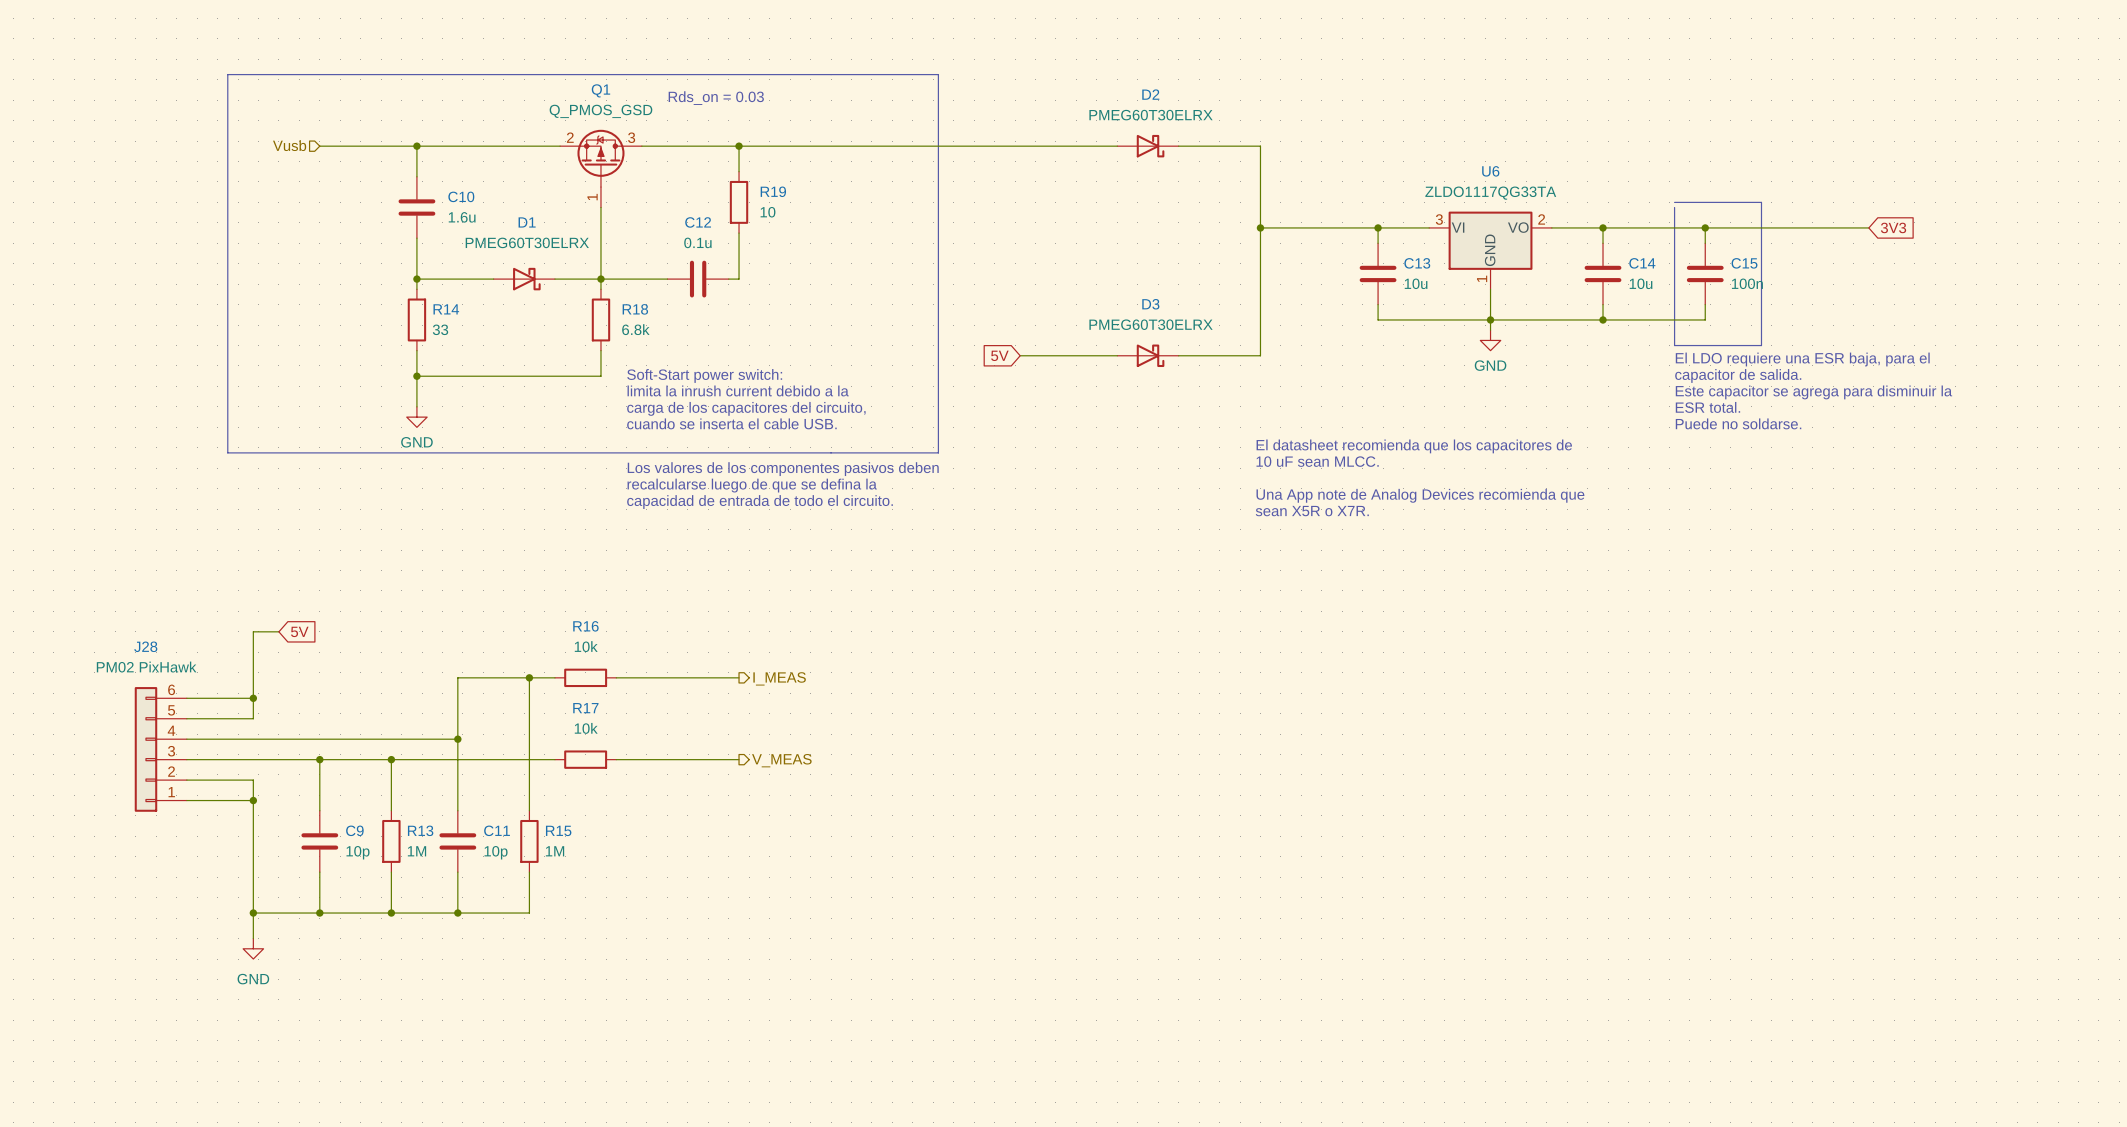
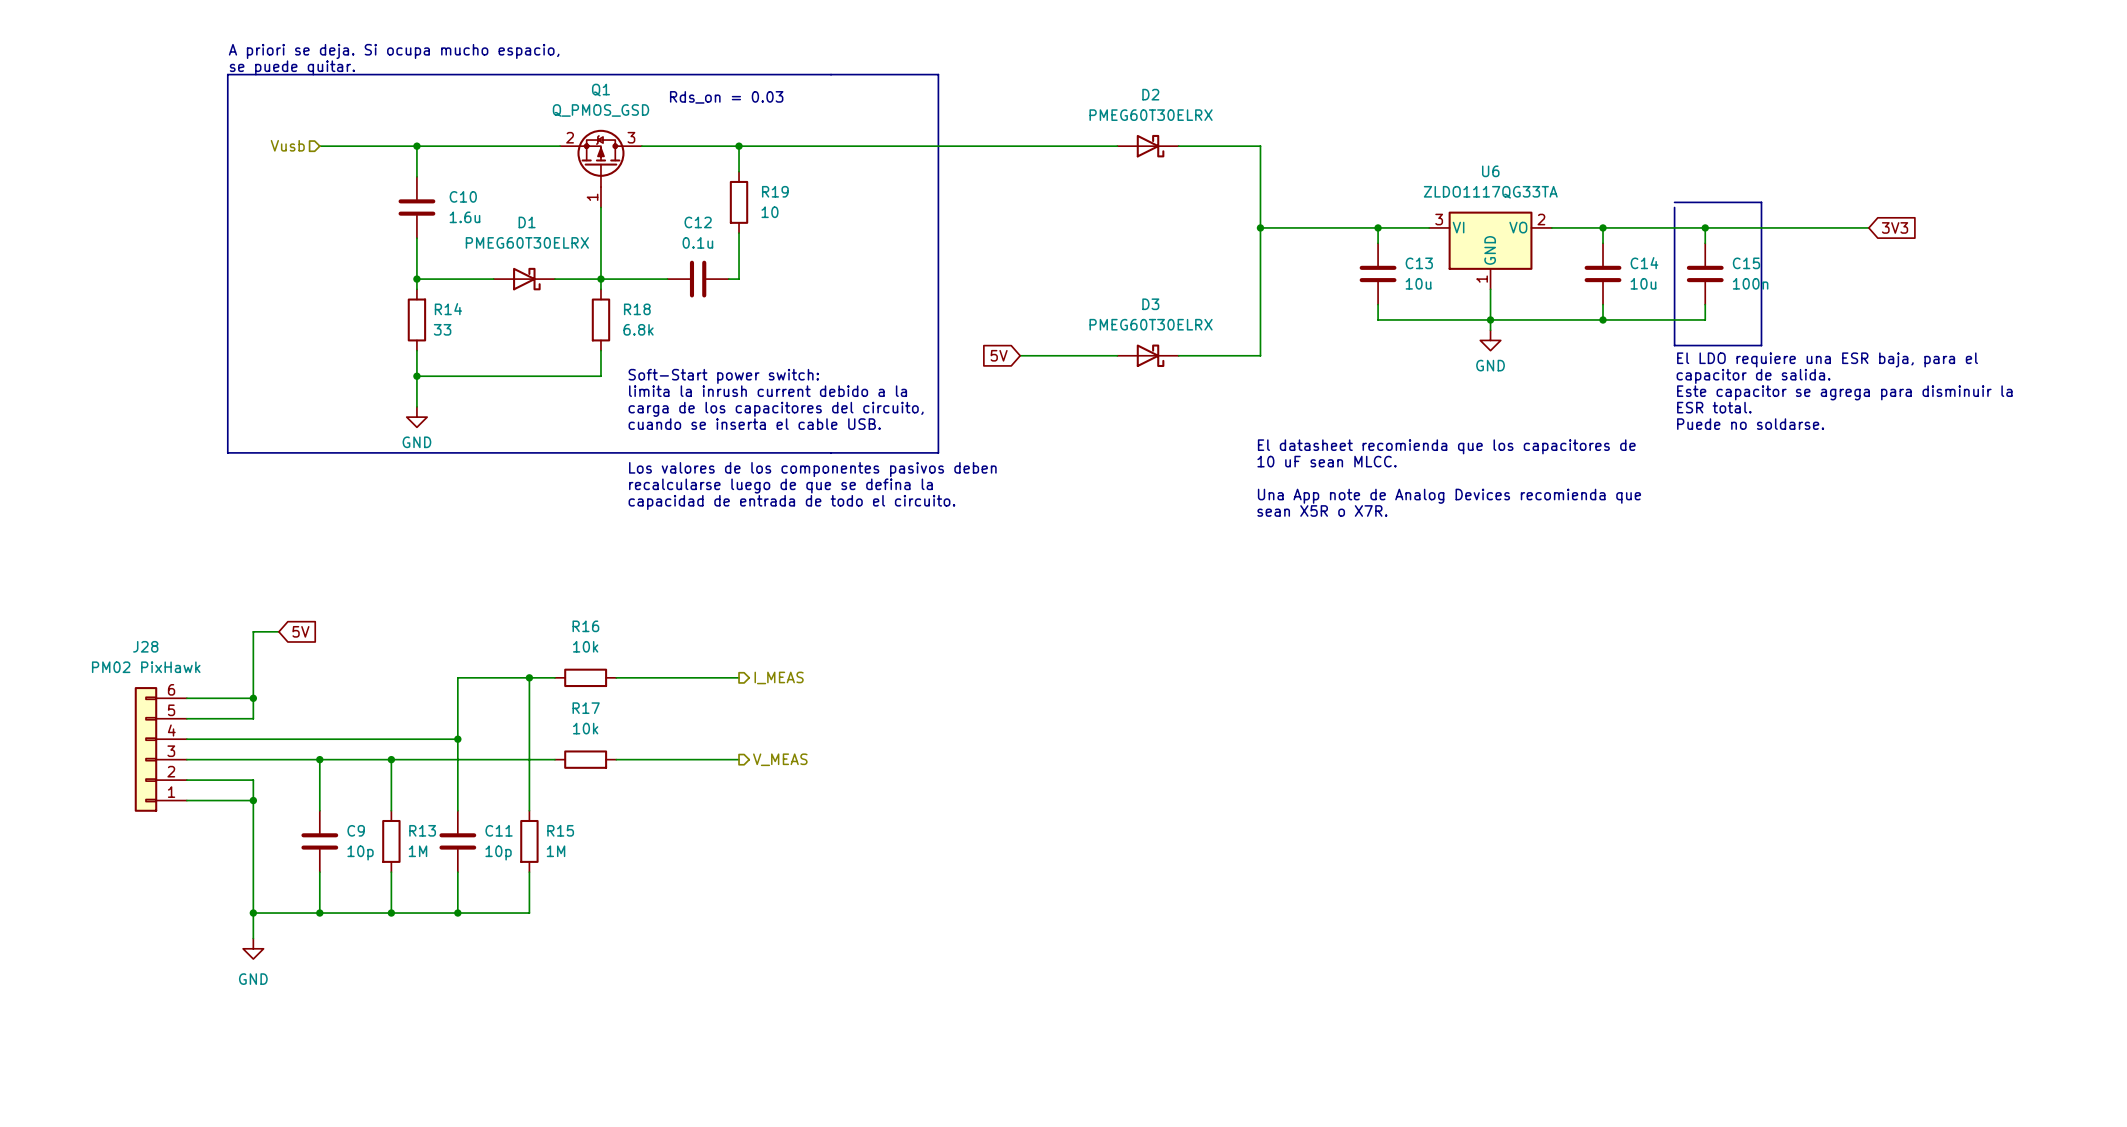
text: none -> A priori se deja. Si ocupa mucho espacio, (394, 51)
text: none -> se puede quitar. (292, 67)

